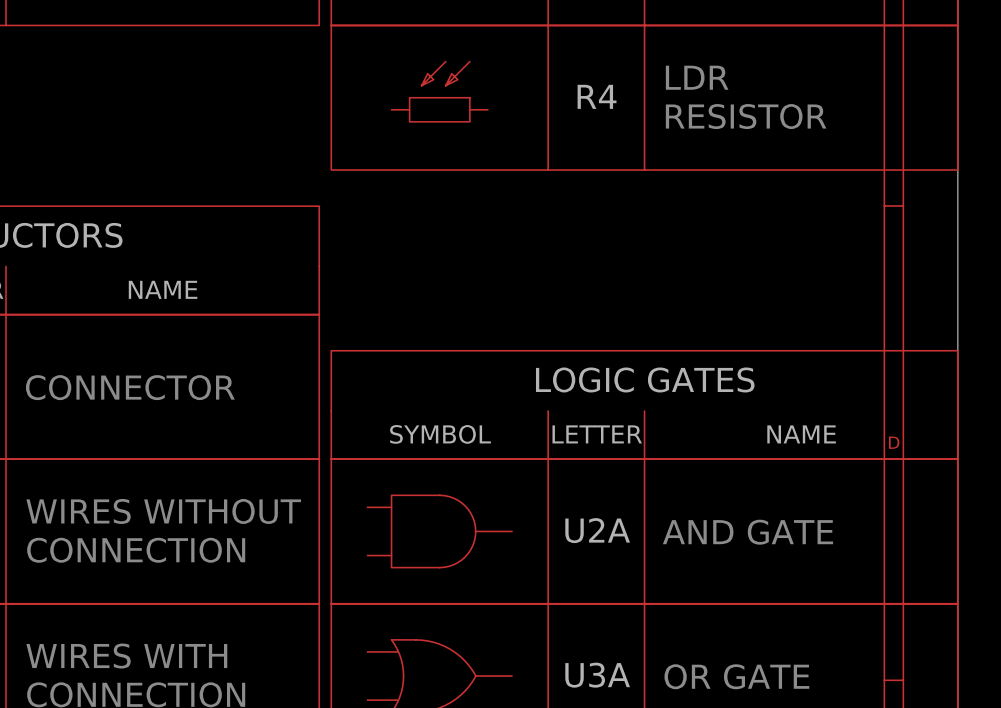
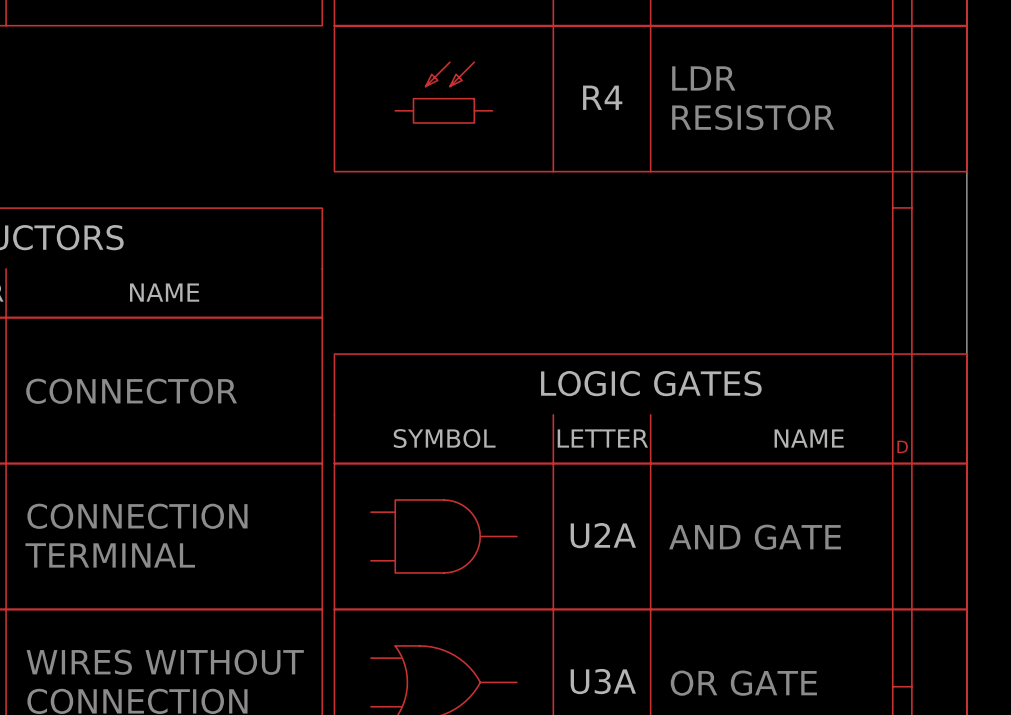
text: WIRES WITHOUT (163, 511) -> CONNECTION (137, 516)
text: CONNECTION (136, 550) -> TERMINAL (110, 555)
text: WIRES WITH (126, 656) -> WIRES WITHOUT (165, 662)

